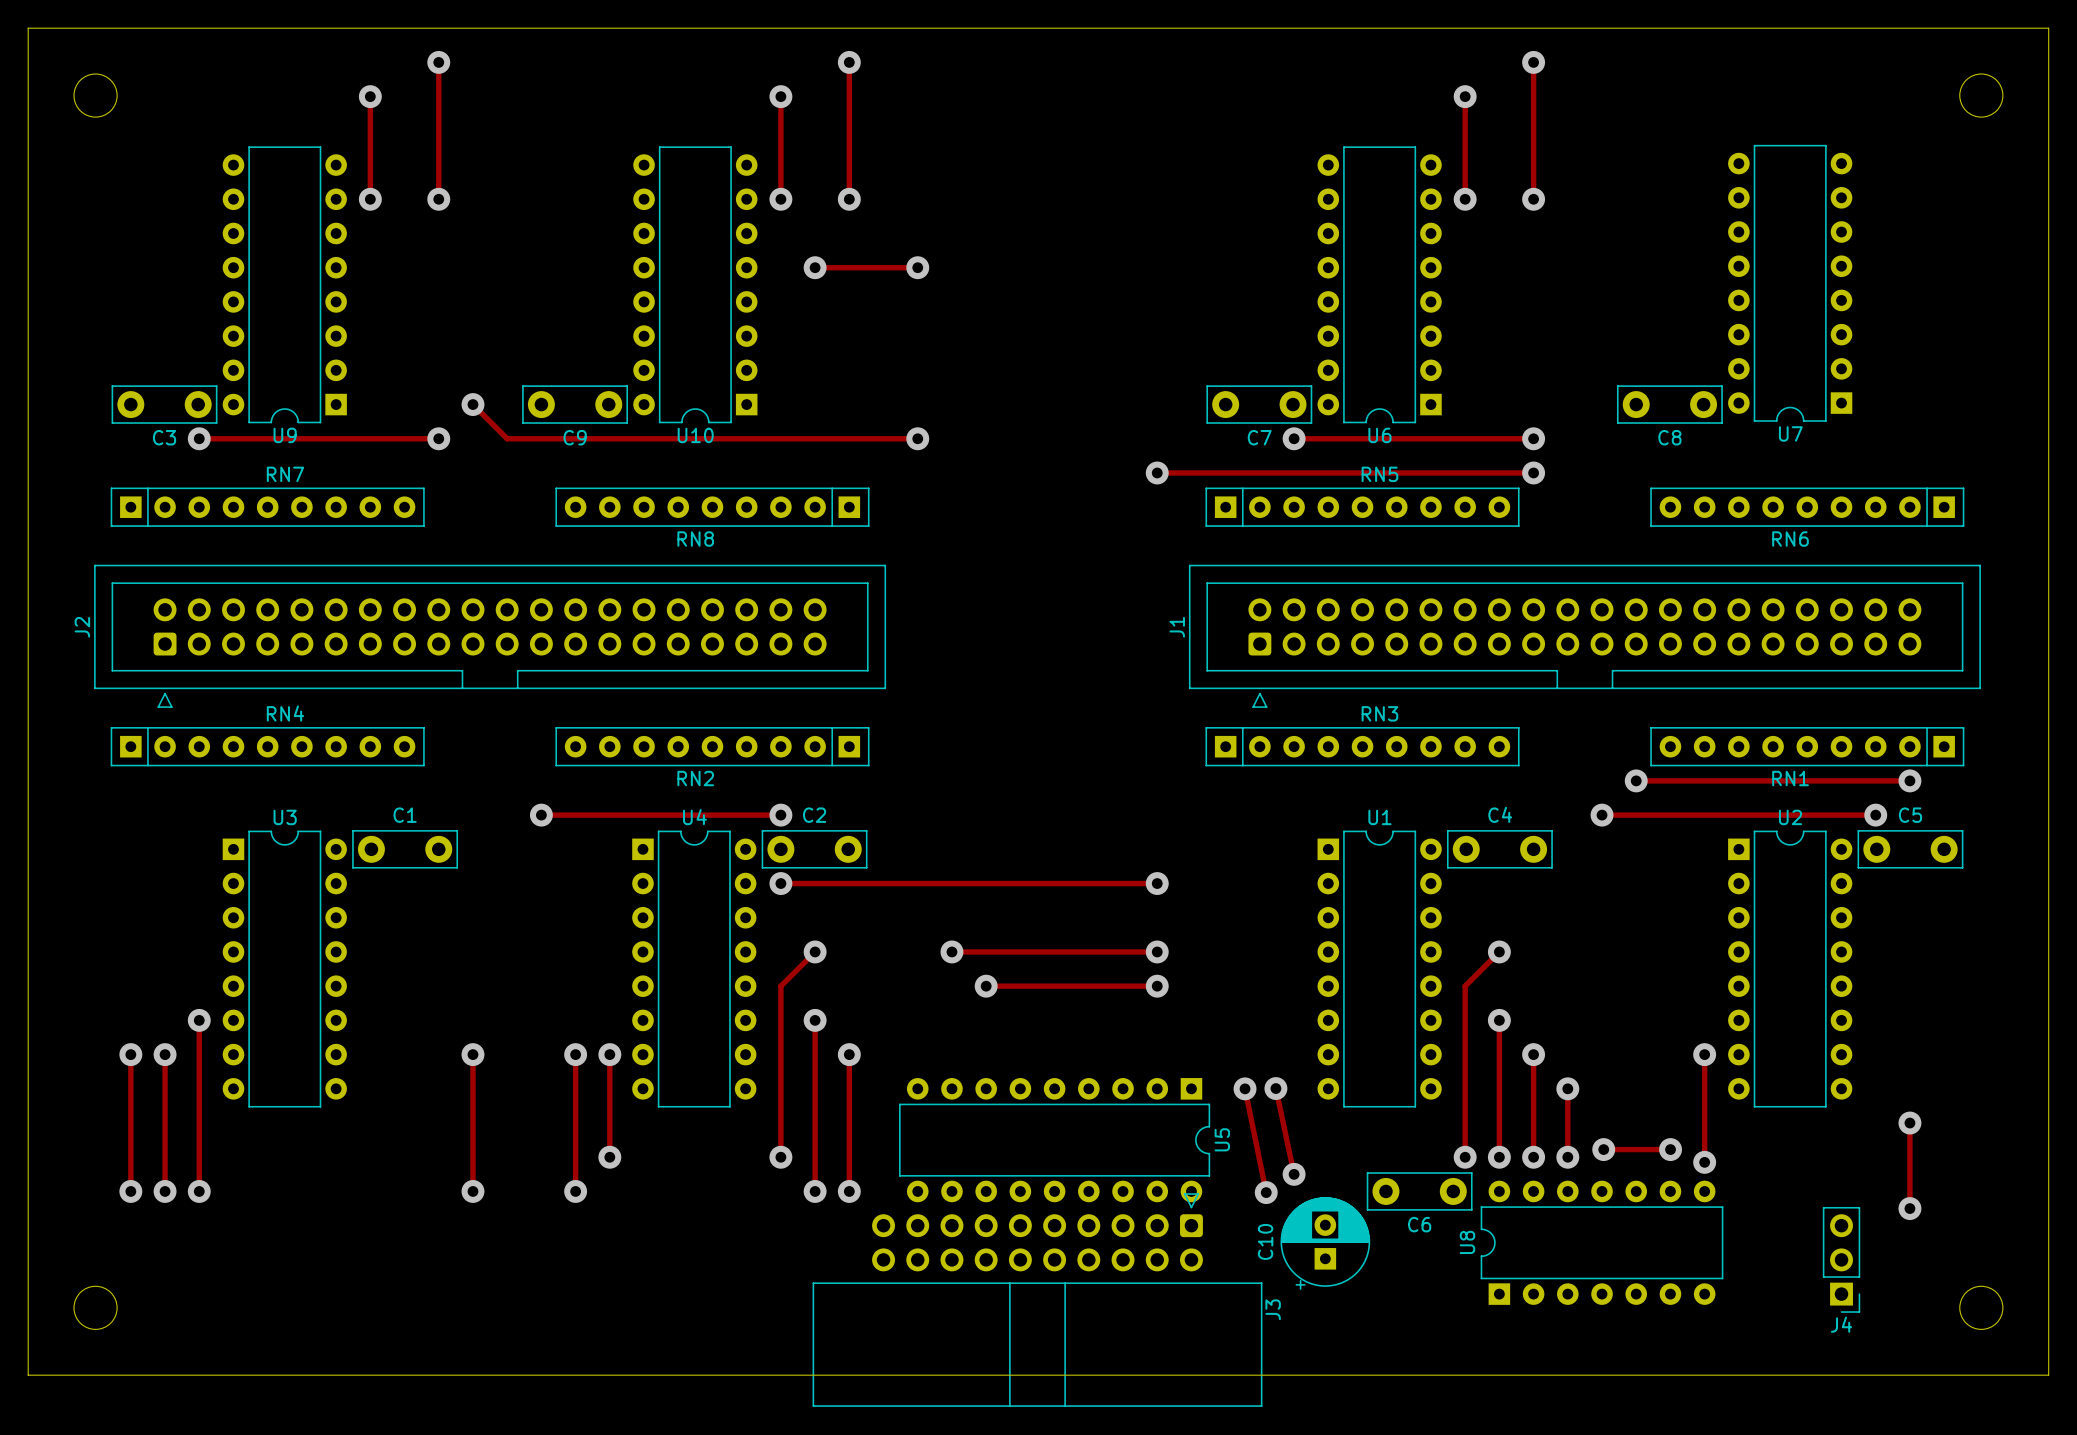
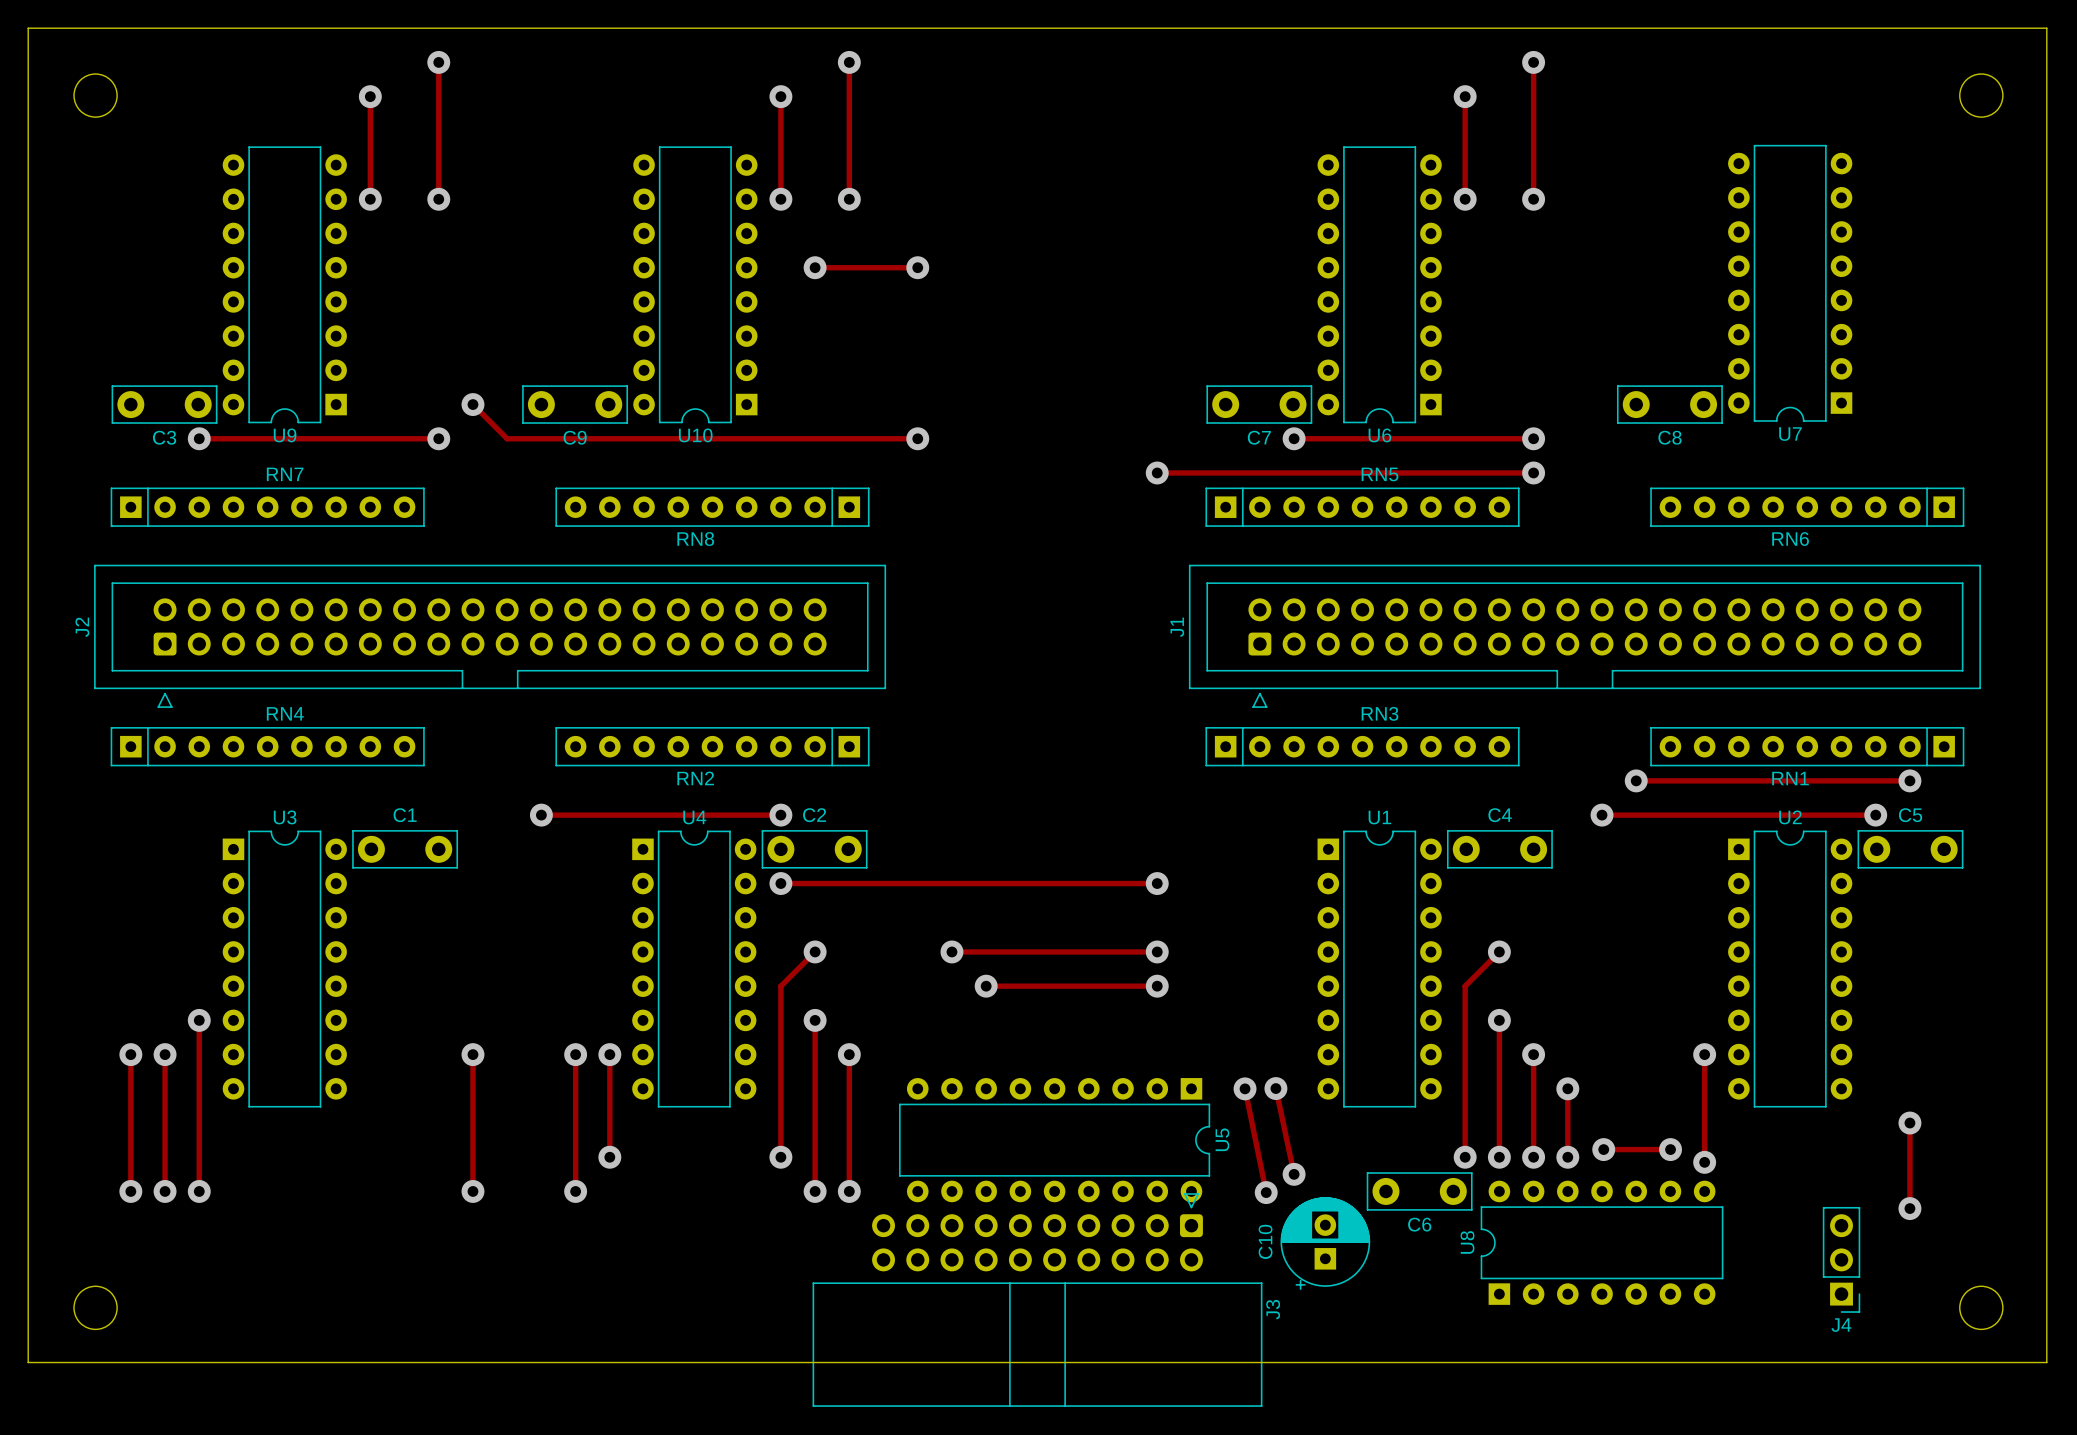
board edge: (2046, 28) (2048, 28) (2048, 1375) (28, 1375) (28, 1362) -> (2046, 28) (2046, 1362) (28, 1362)

